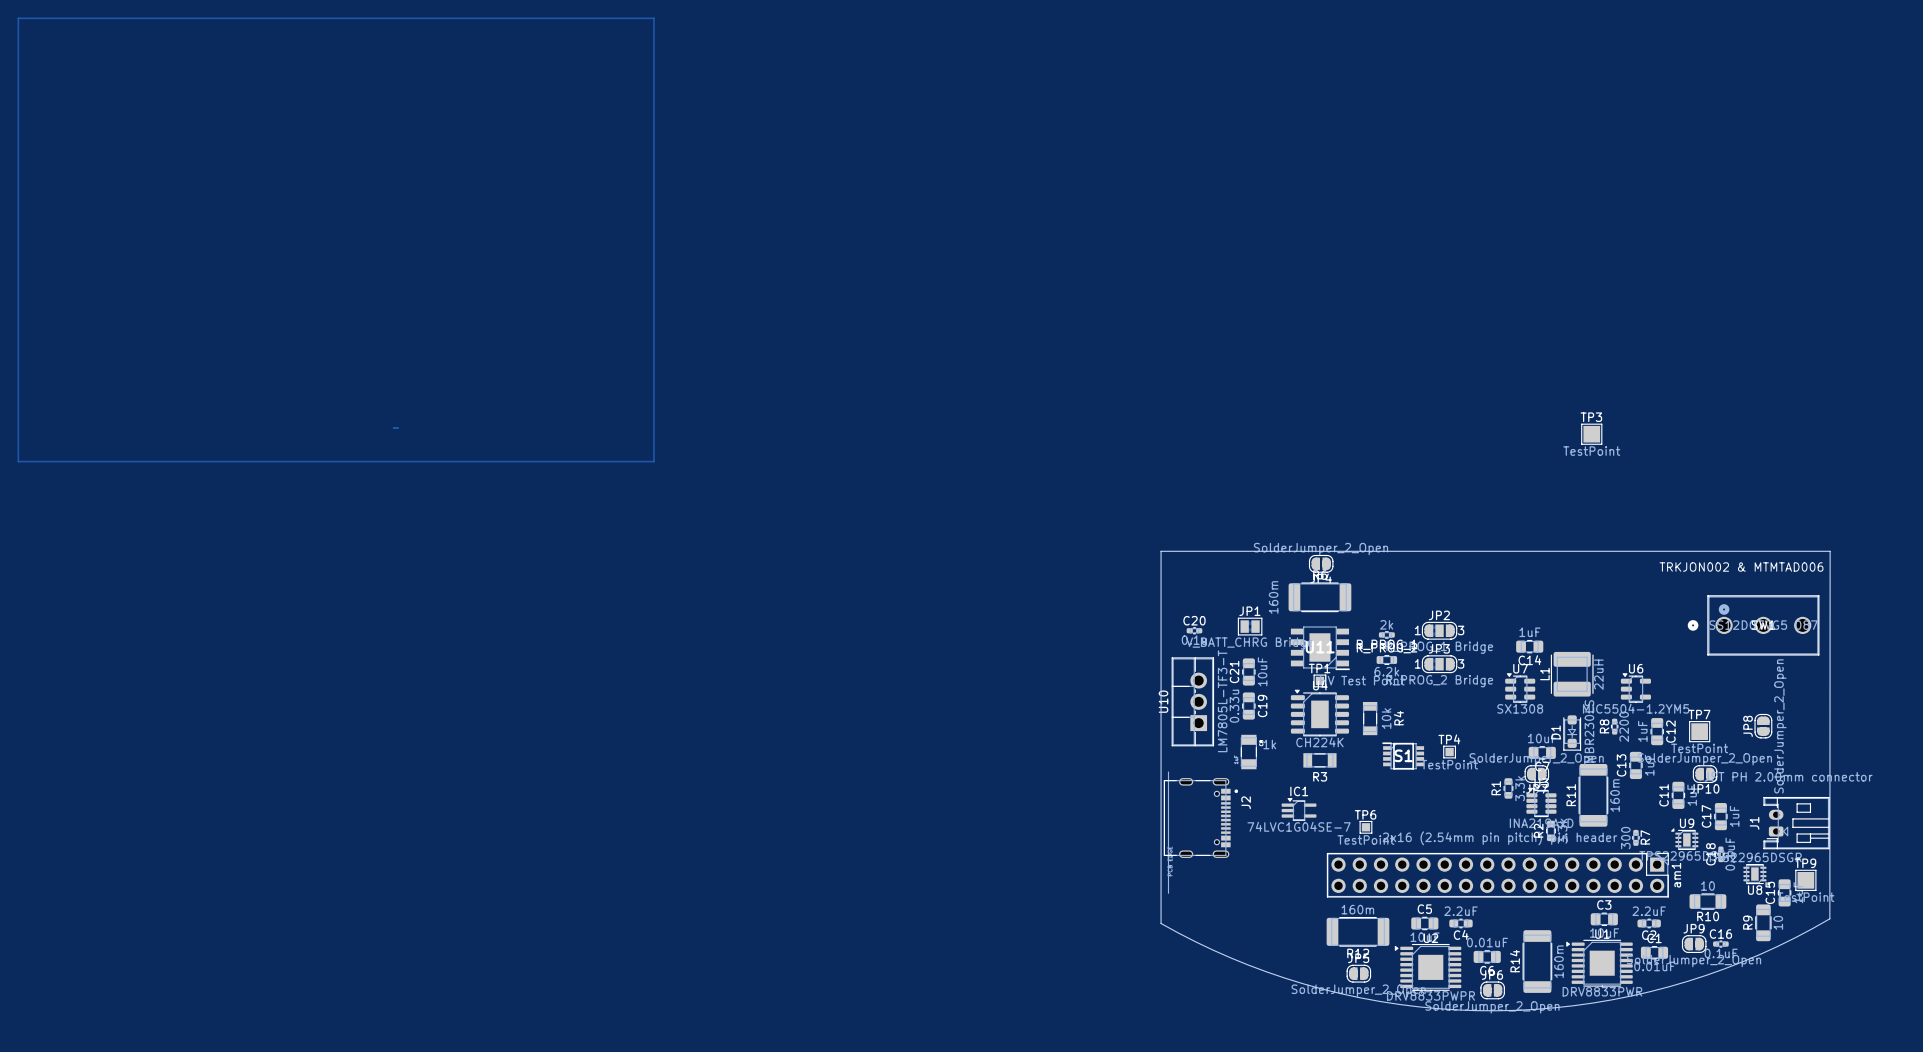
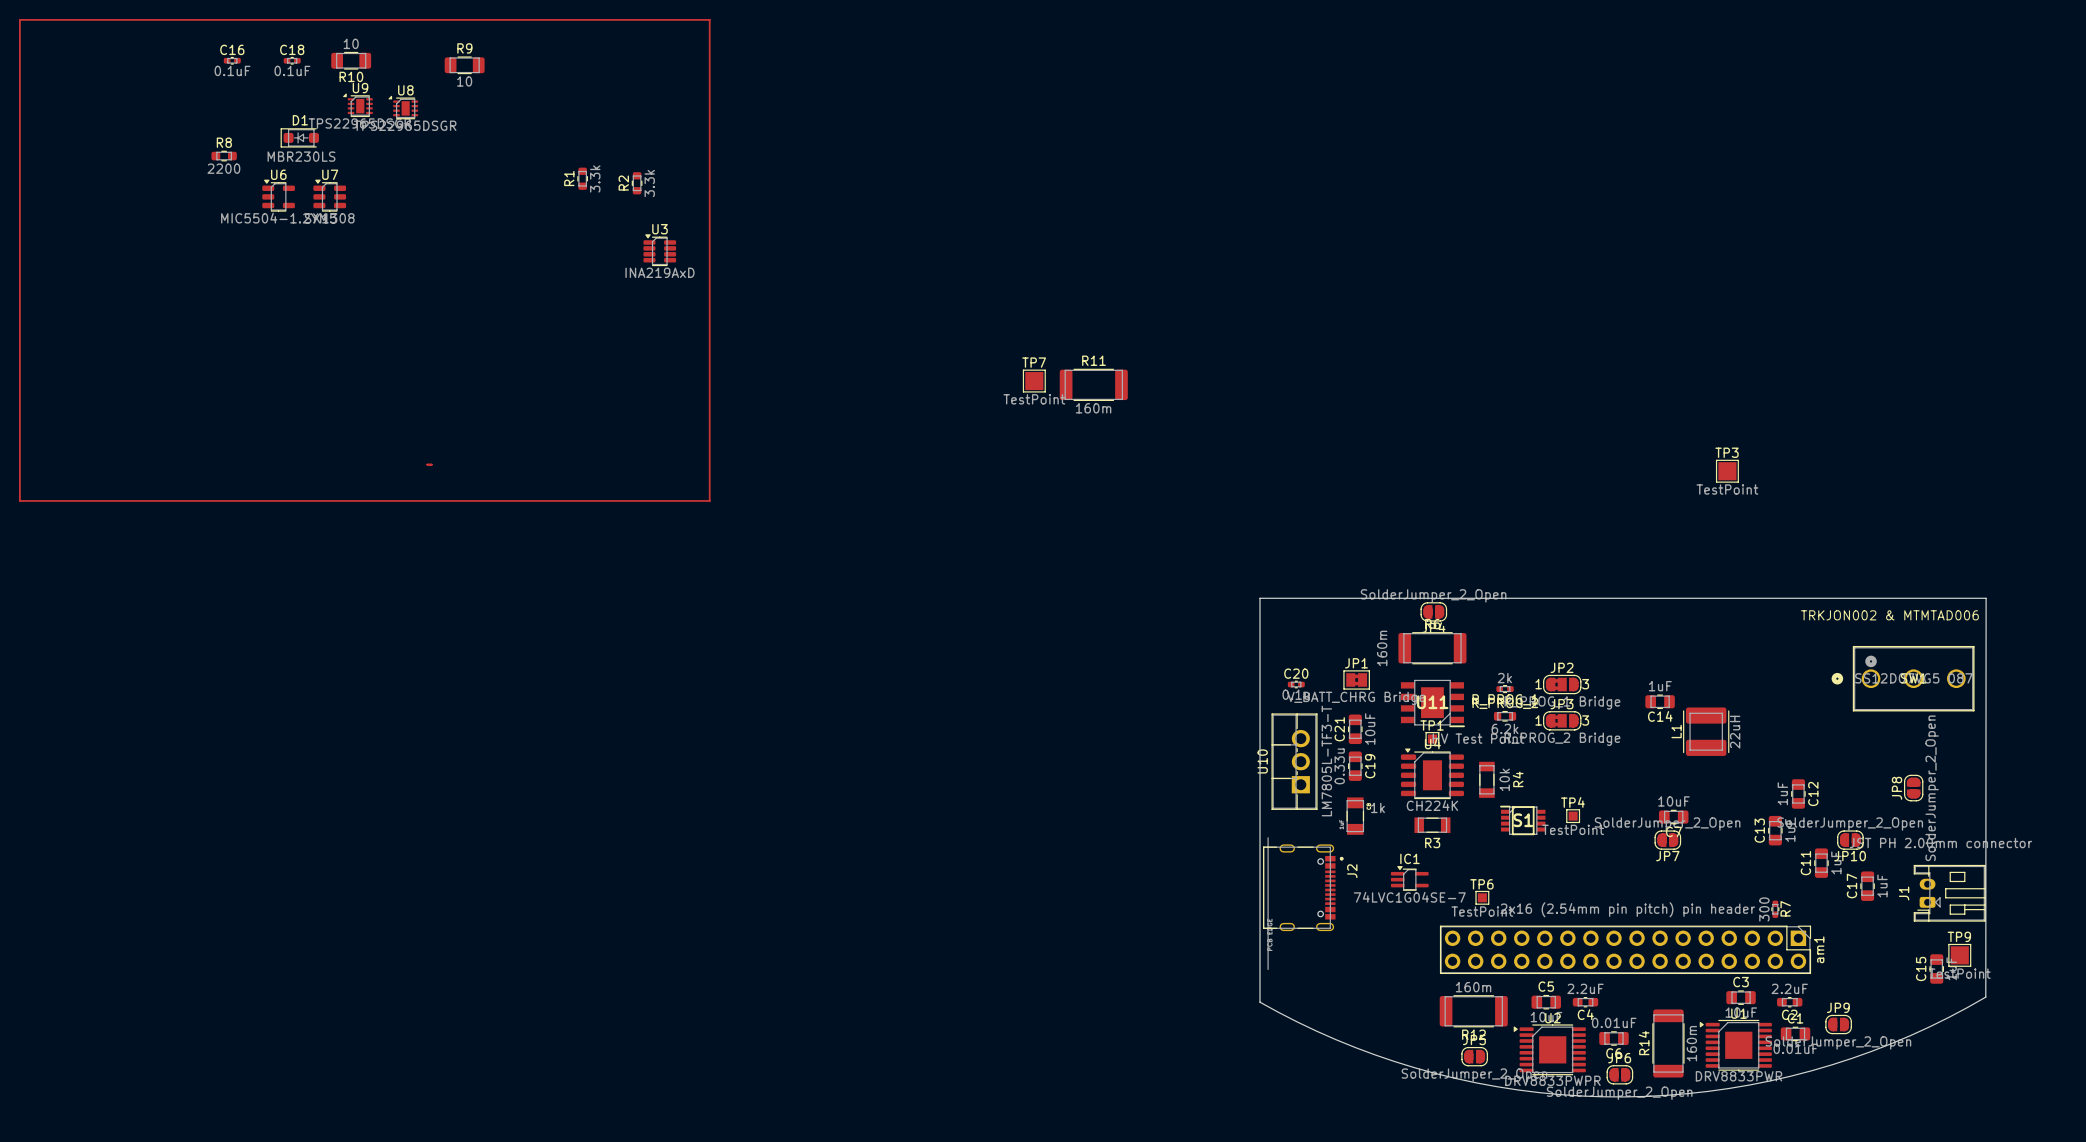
U7 position: (1520, 687) -> (329, 195)
U6 position: (1635, 687) -> (278, 195)
R8 footprint: [1611, 718, 1619, 735] -> [211, 150, 237, 162]
TP7 position: (1699, 731) -> (1034, 381)
D1 rotation: 0° (1572, 732) -> 90° clockwise (299, 137)
D1 position: (1572, 732) -> (299, 137)
R1 position: (1508, 788) -> (582, 178)
R11 rotation: 0° (1593, 795) -> 90° clockwise (1093, 384)
R11 position: (1593, 795) -> (1093, 384)
U3 position: (1541, 802) -> (659, 250)
R2 position: (1550, 830) -> (637, 183)
U9 position: (1684, 839) -> (357, 105)
C18 rotation: 0° (1720, 854) -> 90° clockwise (292, 60)
C18 position: (1720, 854) -> (292, 60)
U8 rotation: 0° (1757, 874) -> 180° (403, 107)
U8 position: (1757, 874) -> (403, 107)
R10 position: (1707, 901) -> (351, 60)
R9 rotation: 0° (1763, 922) -> 90° clockwise (464, 65)
R9 position: (1763, 922) -> (464, 65)
C16 position: (1720, 944) -> (232, 60)

